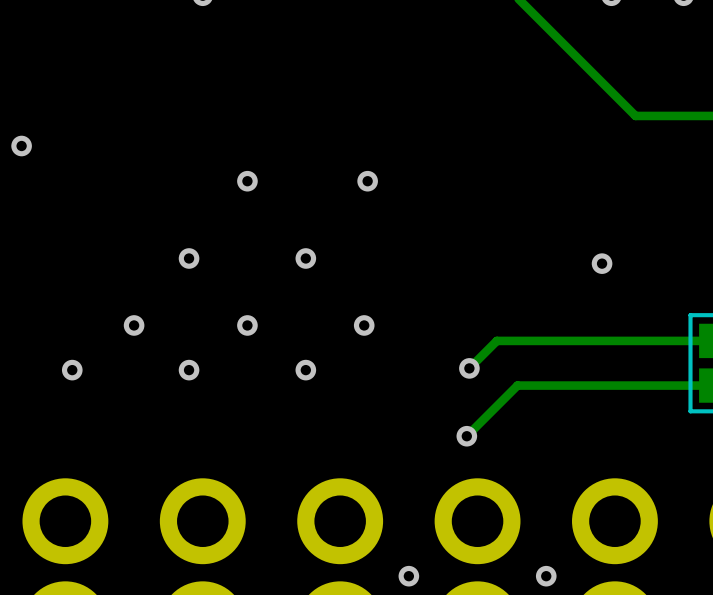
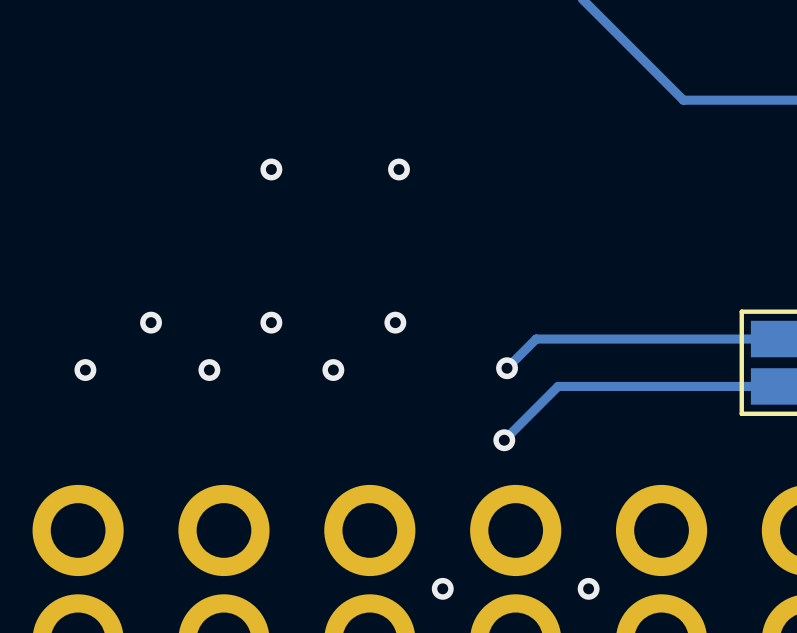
via: (21, 146) -> none
via: (189, 258) -> none
via: (305, 258) -> none
via: (602, 263) -> none

